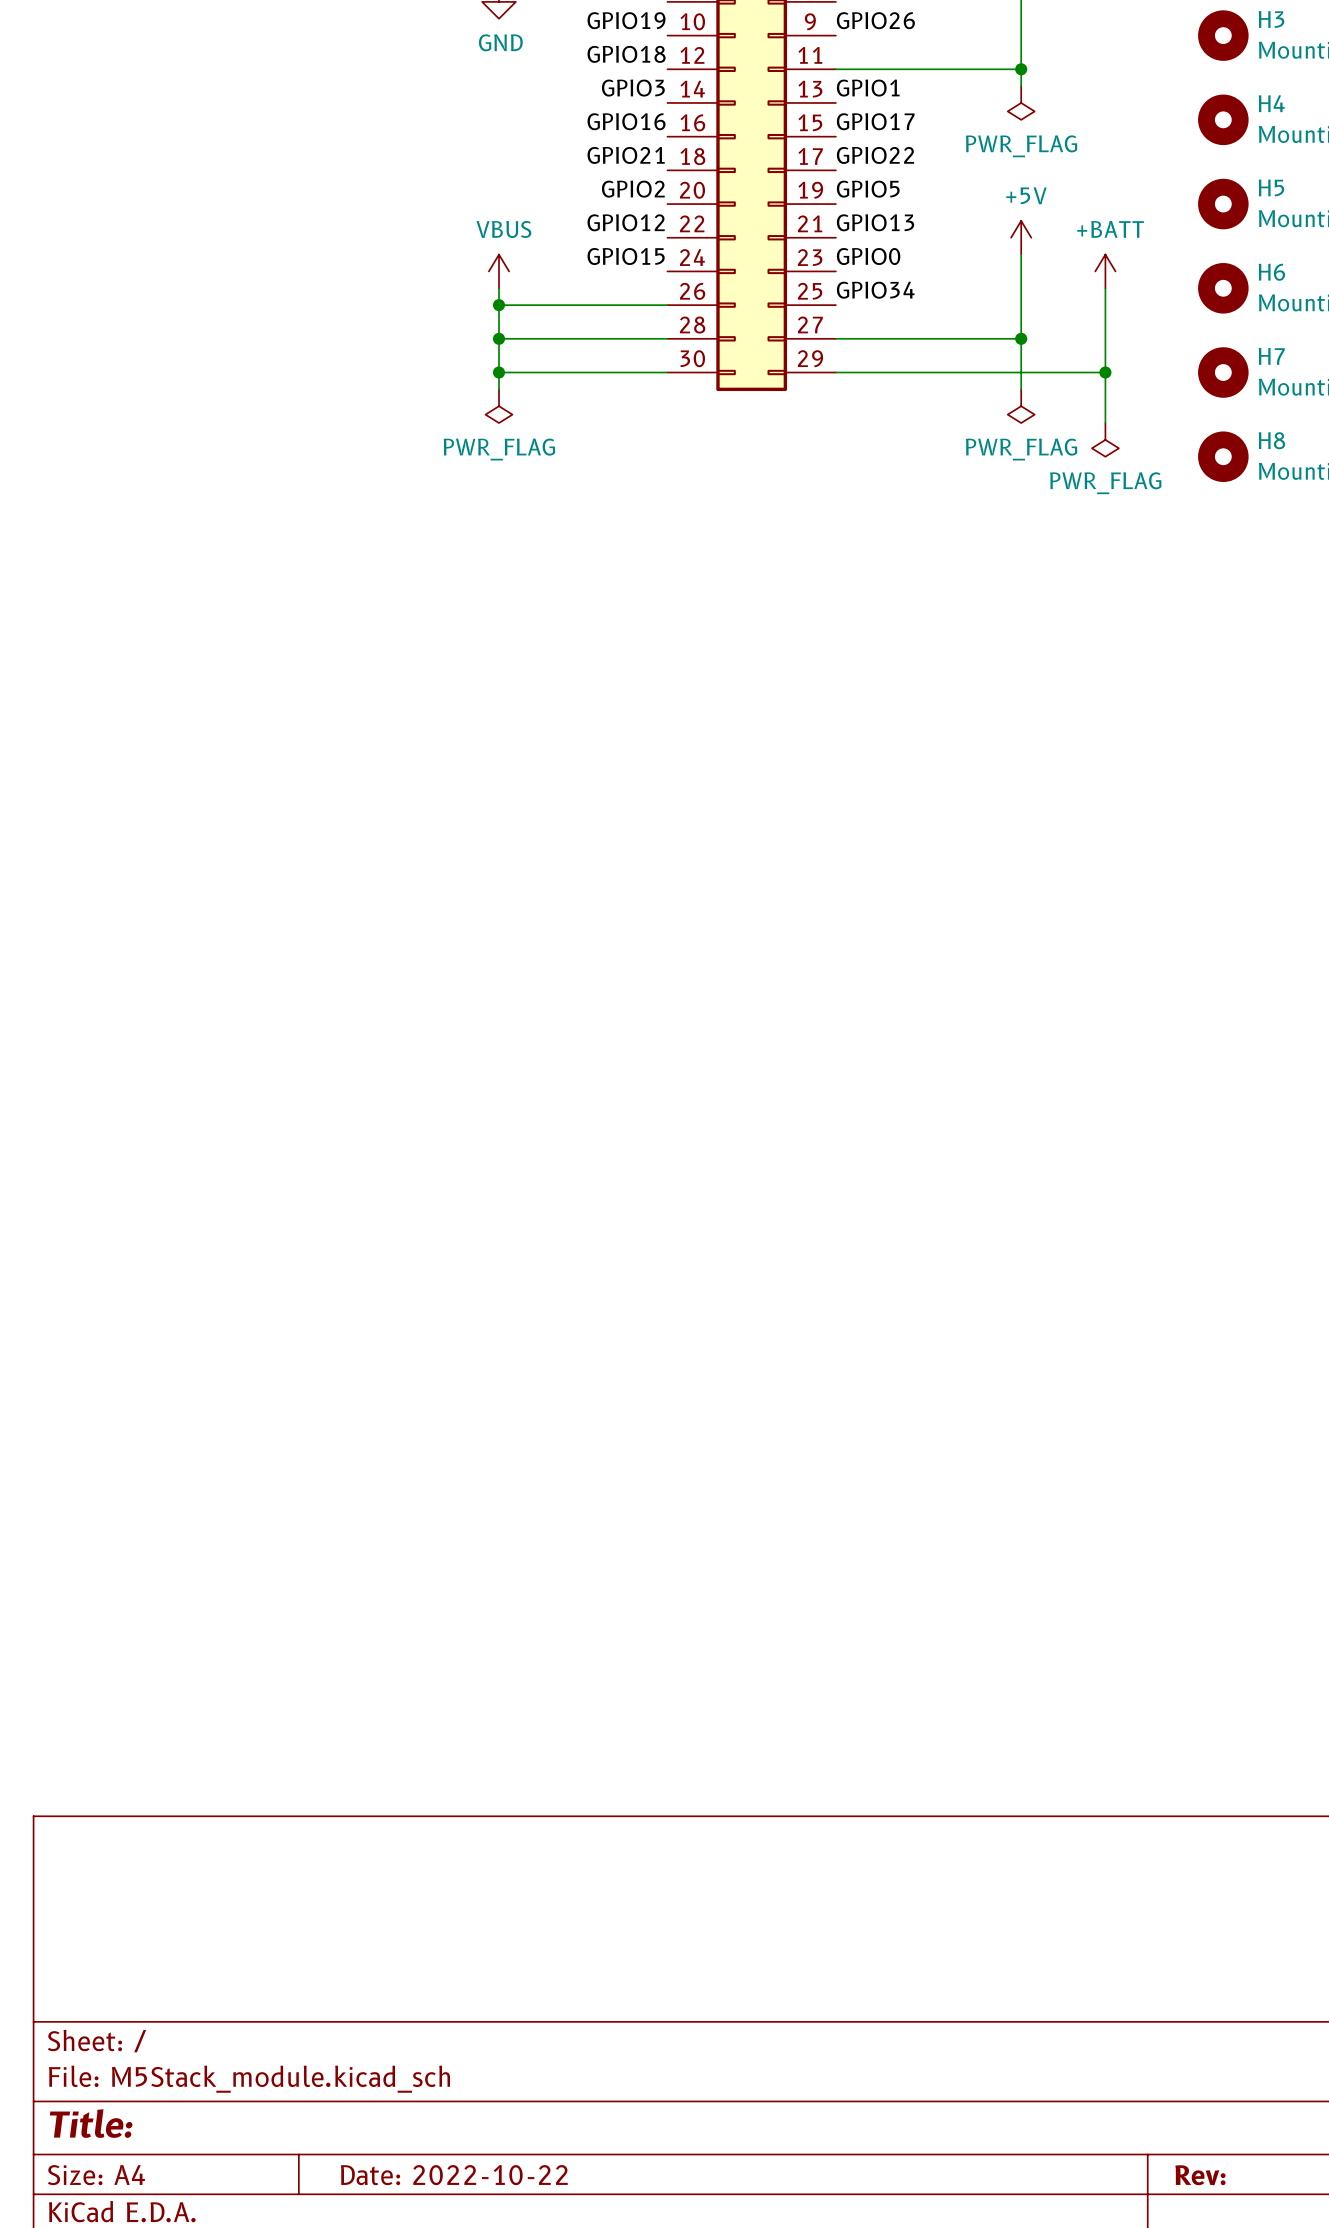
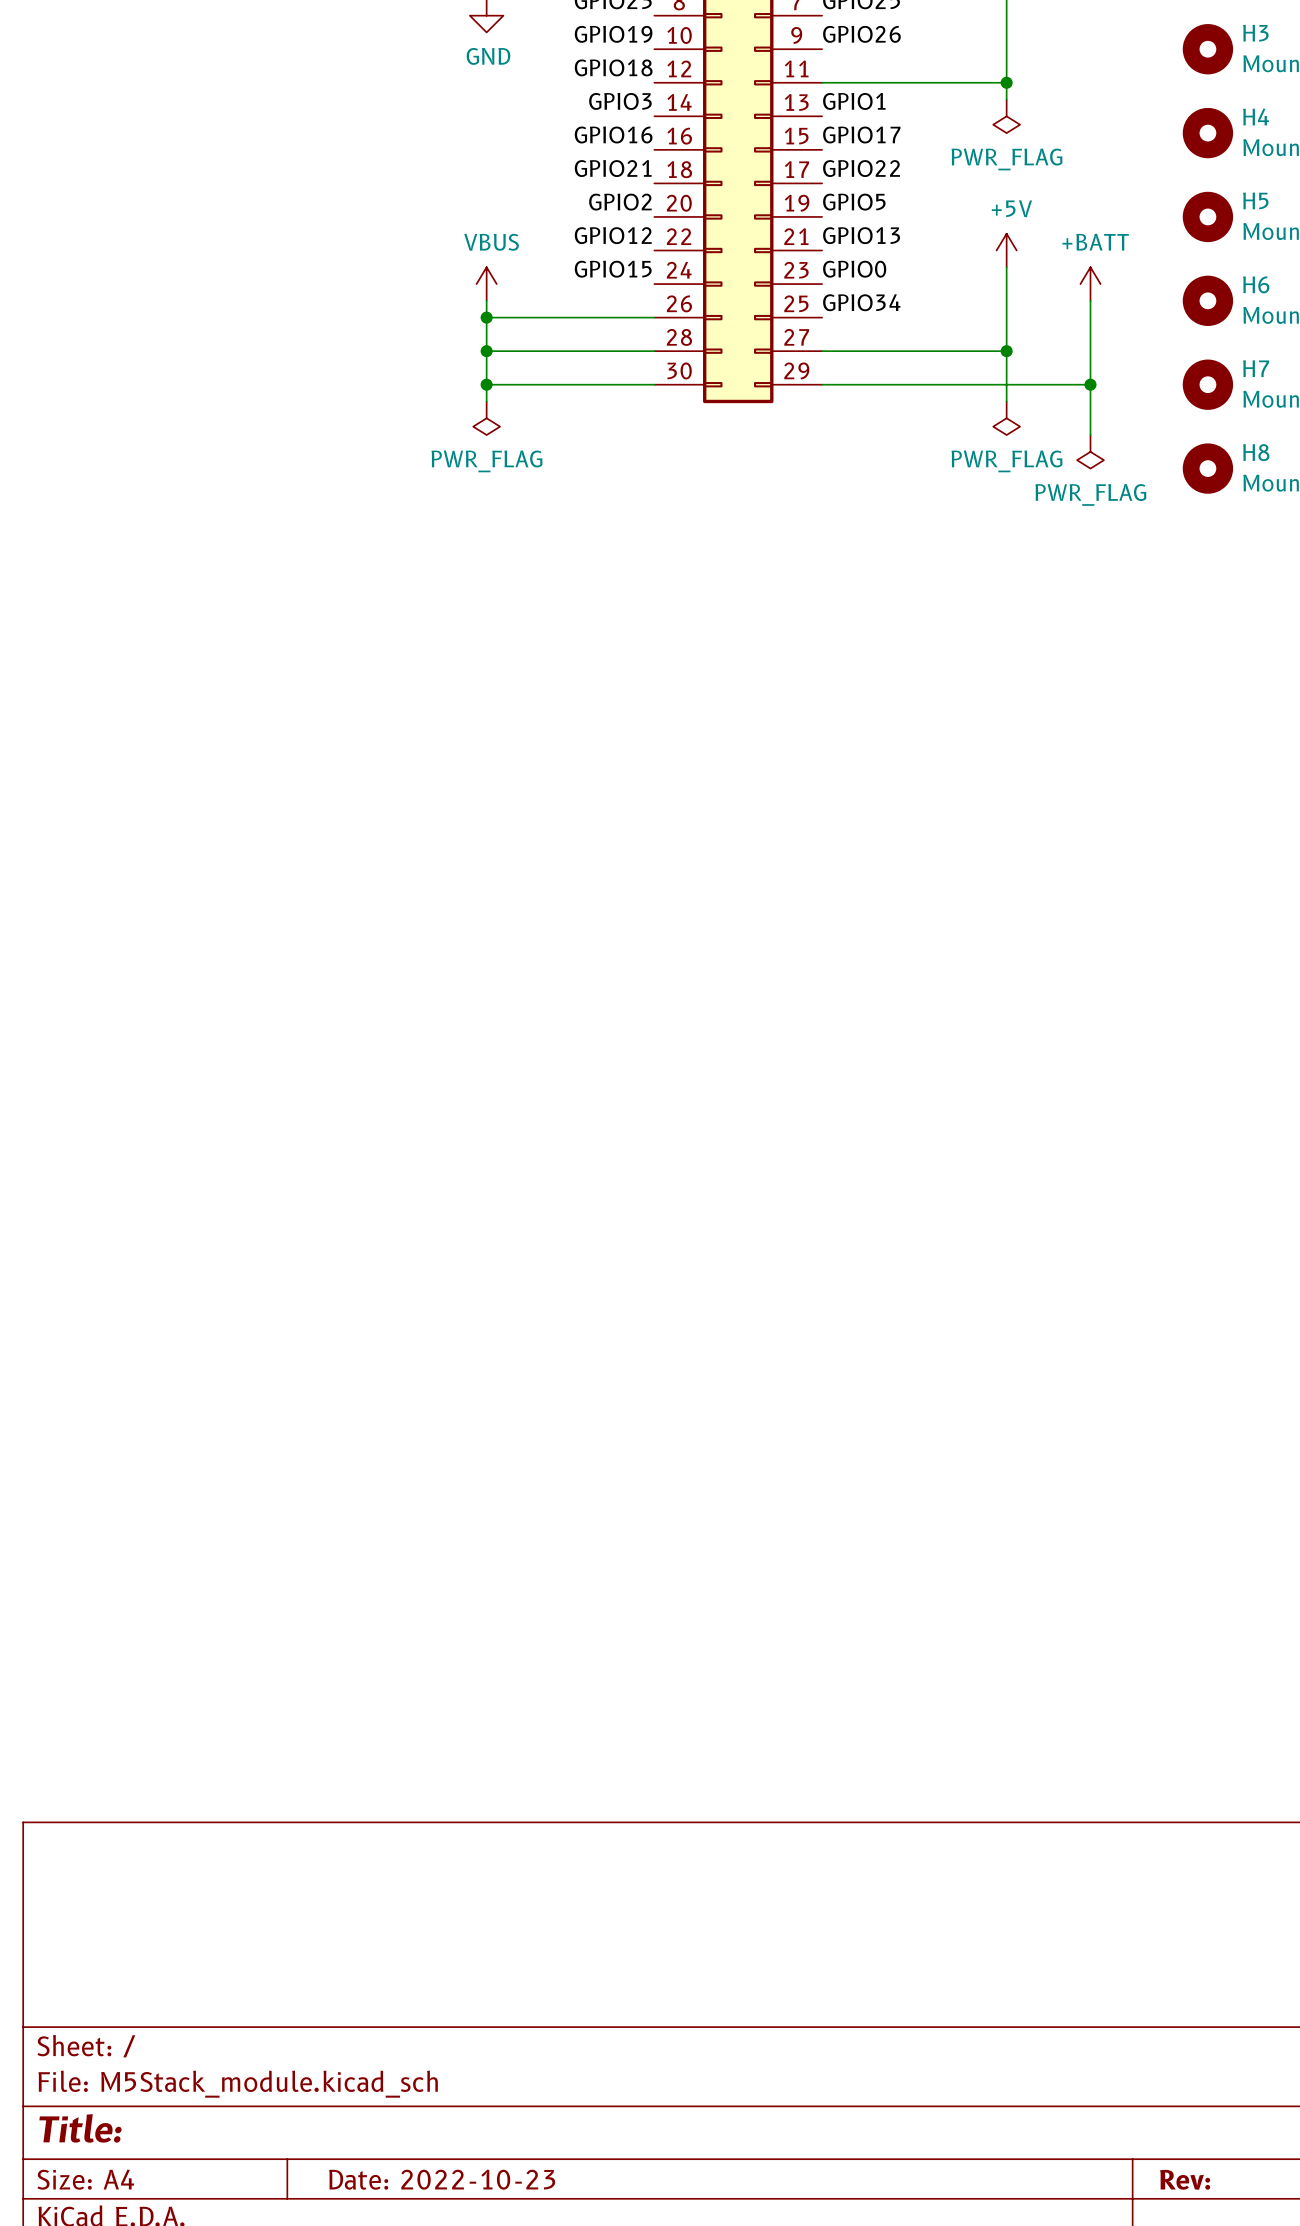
title block: Date: 2022-10-22 (454, 2175) -> Date: 2022-10-23 (442, 2179)

